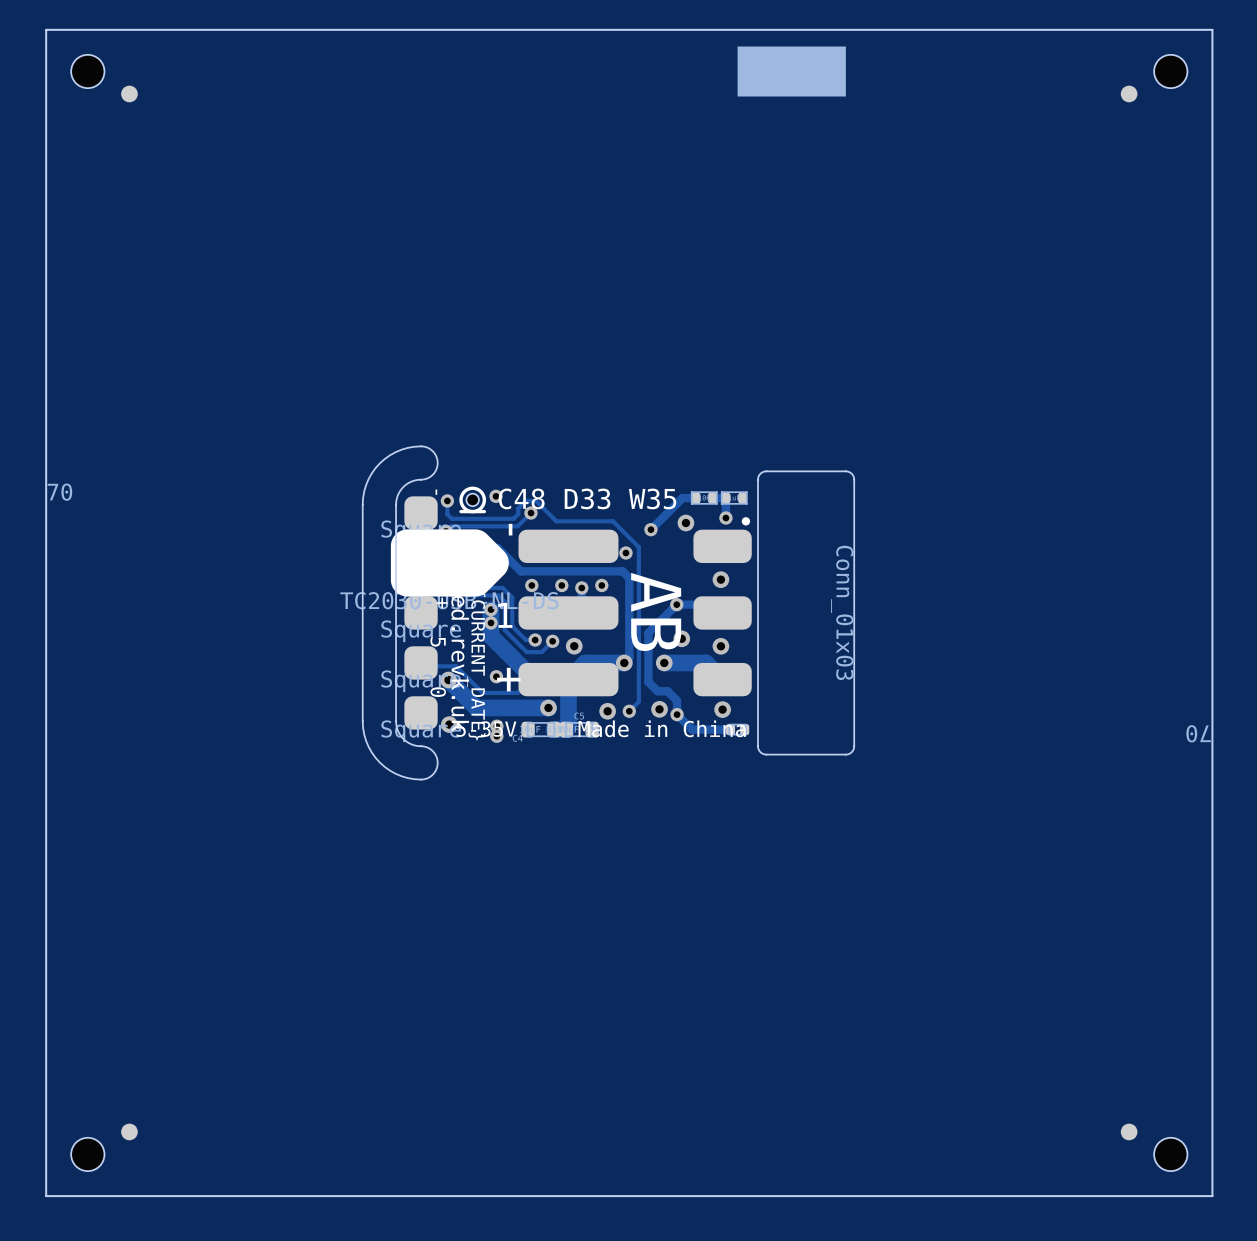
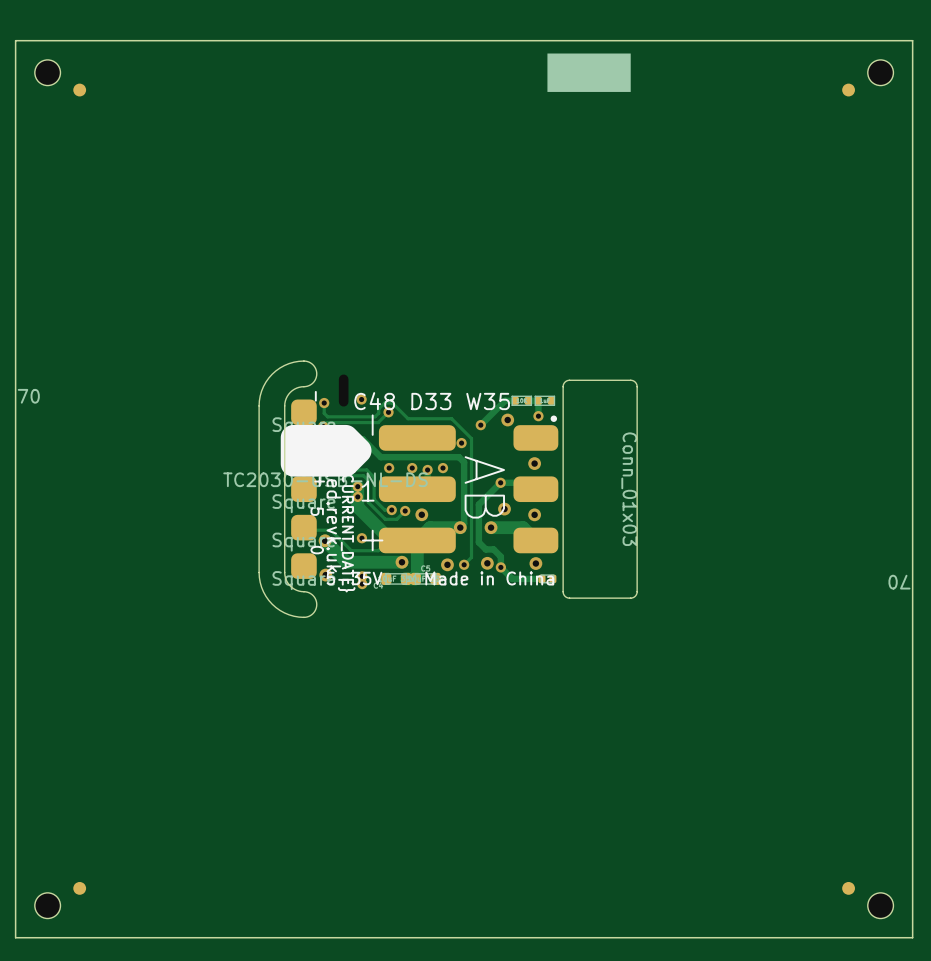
part footprint: [459, 486, 487, 514] -> [338, 374, 349, 407]

